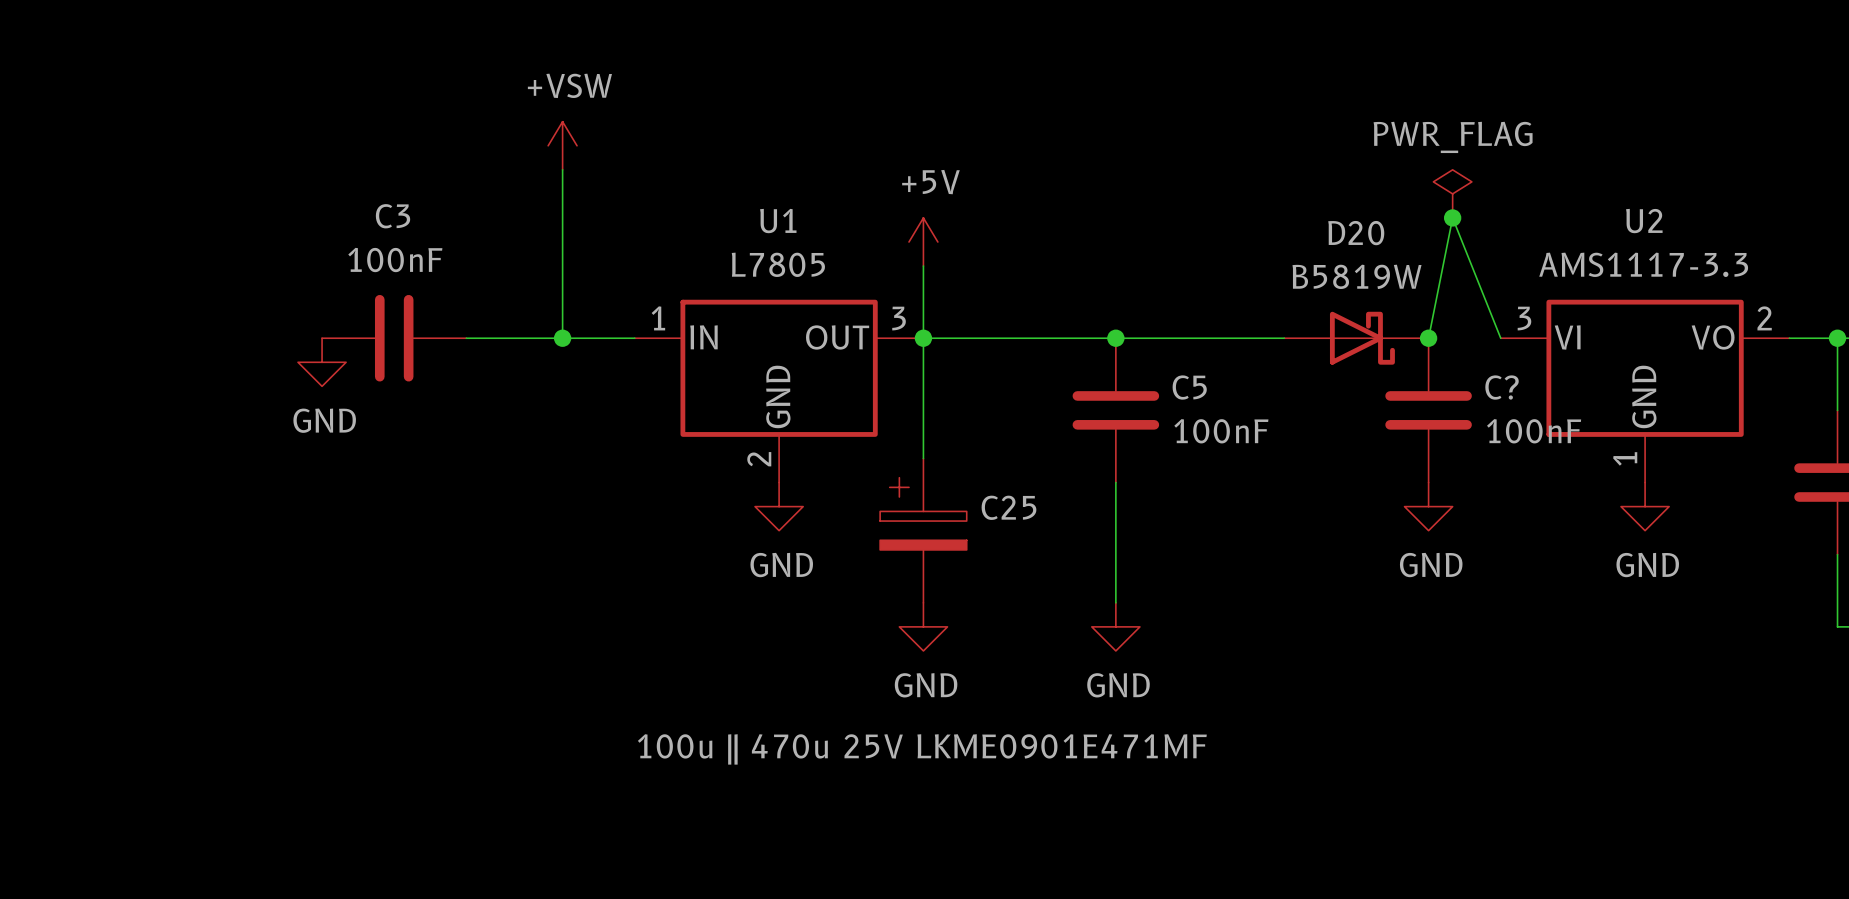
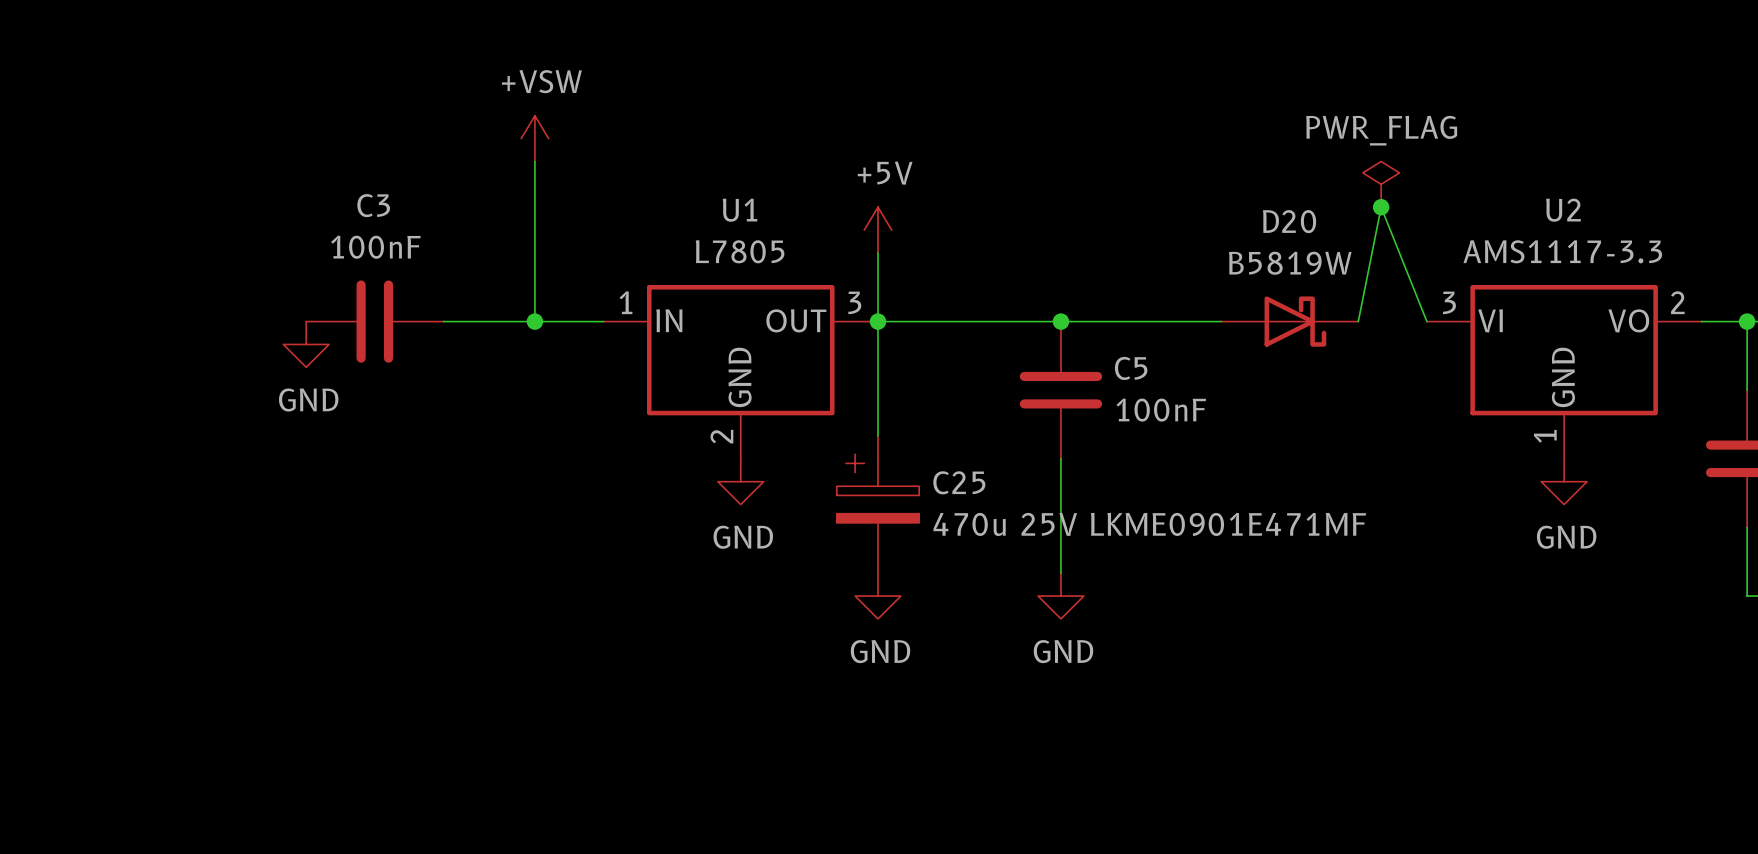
junction: (1428, 338) -> none
C?: 100nF (1428, 410) -> none
power symbol: GND (1428, 506) -> none
C25 value: 100u || 470u 25V LKME0901E471MF (922, 749) -> 470u 25V LKME0901E471MF (1149, 524)

